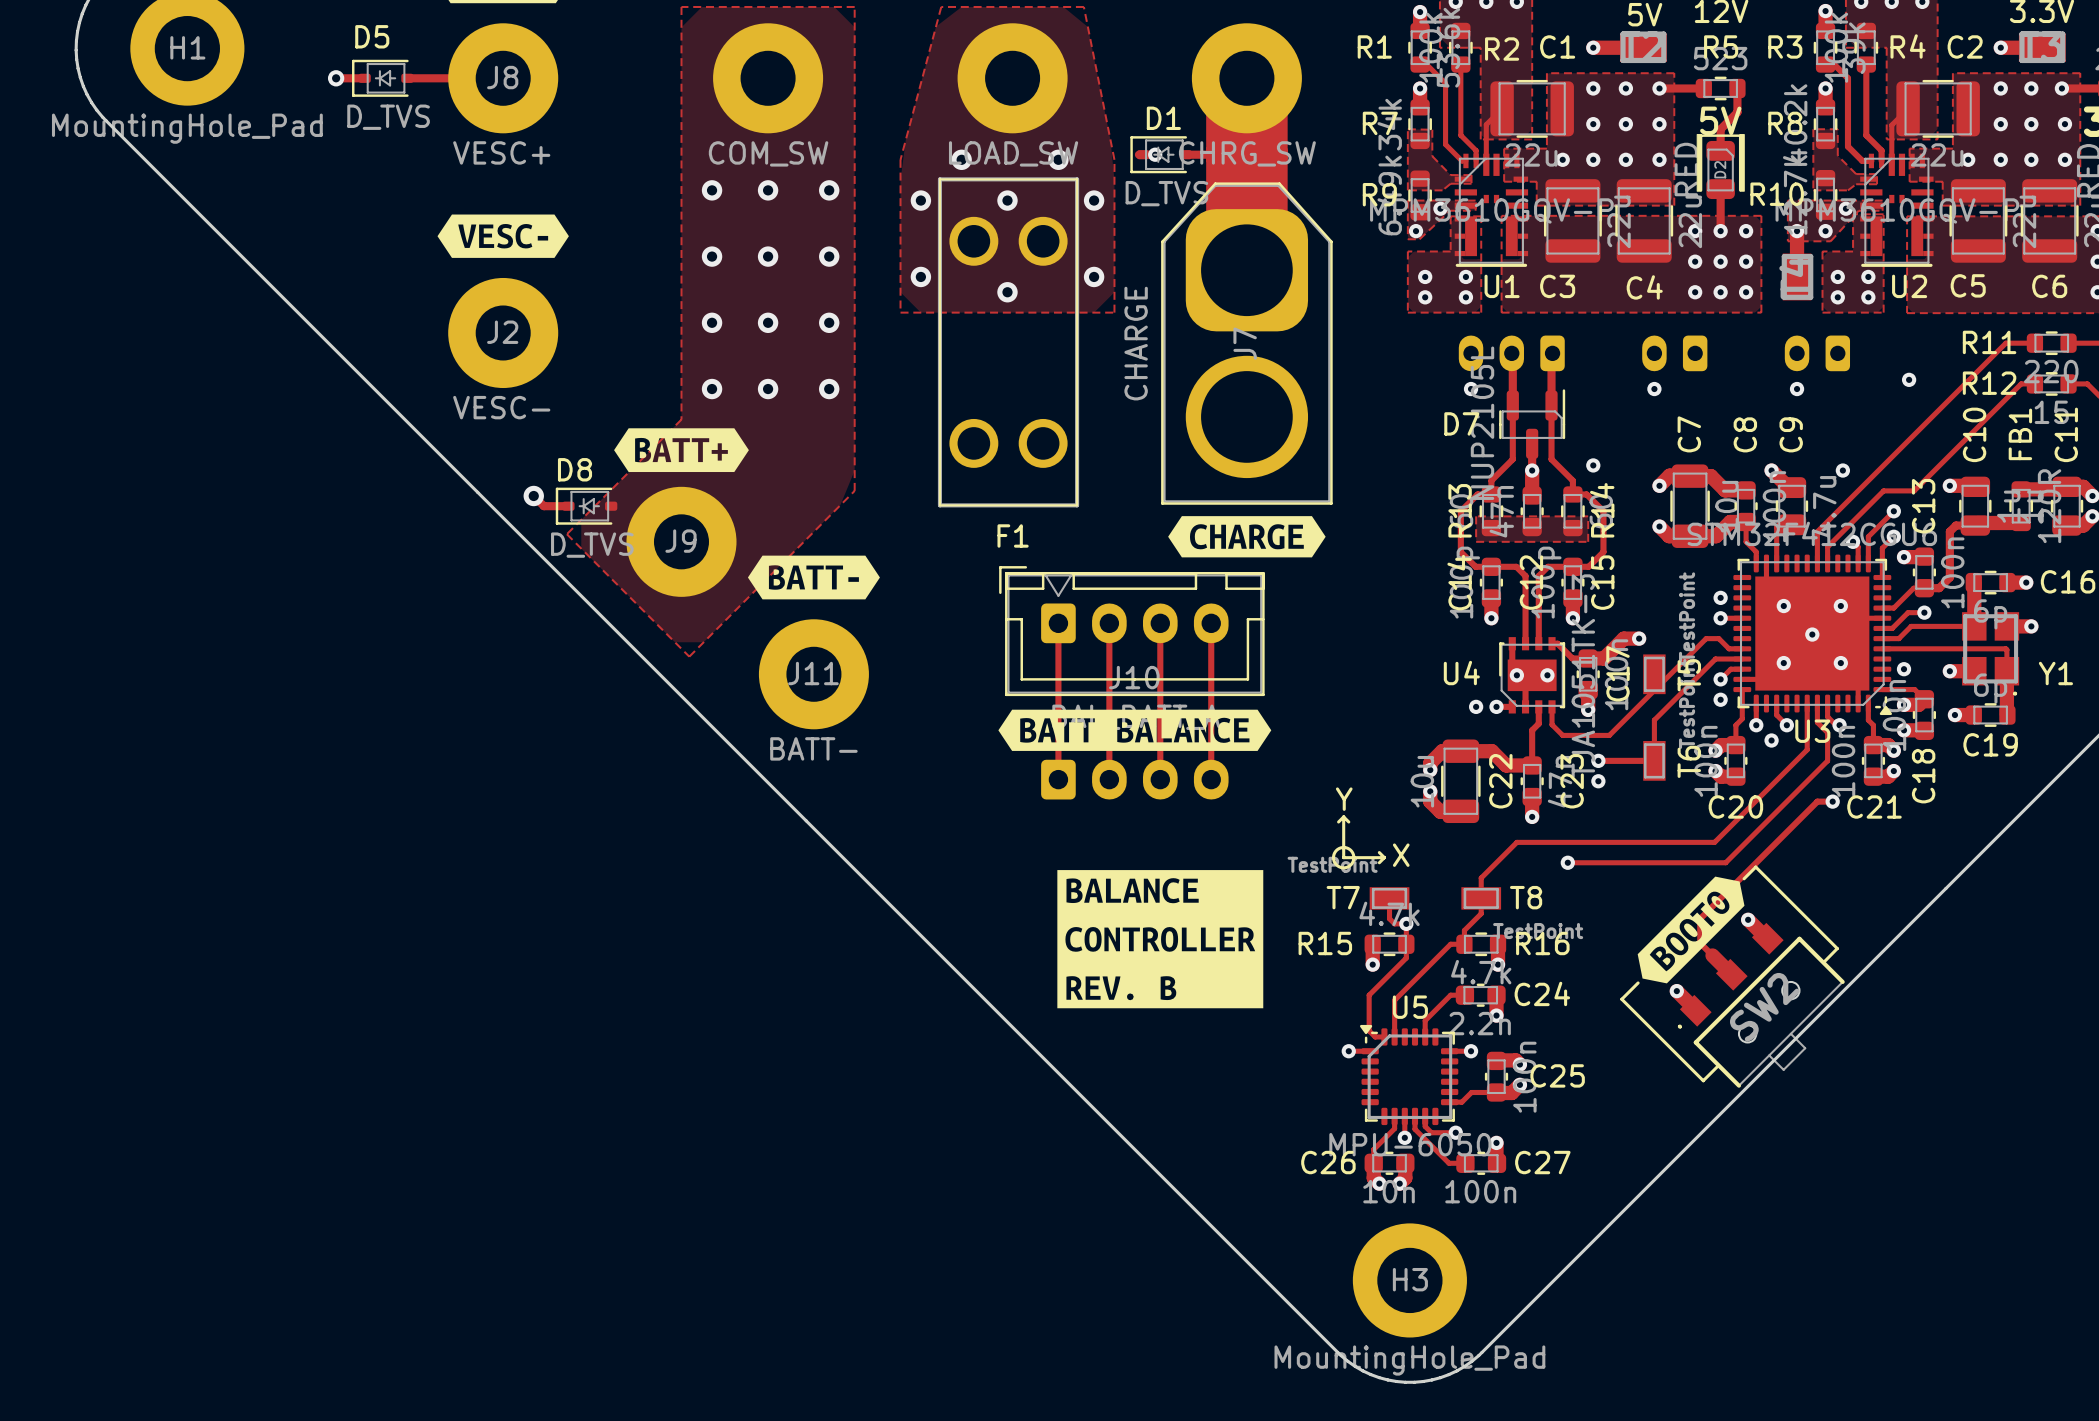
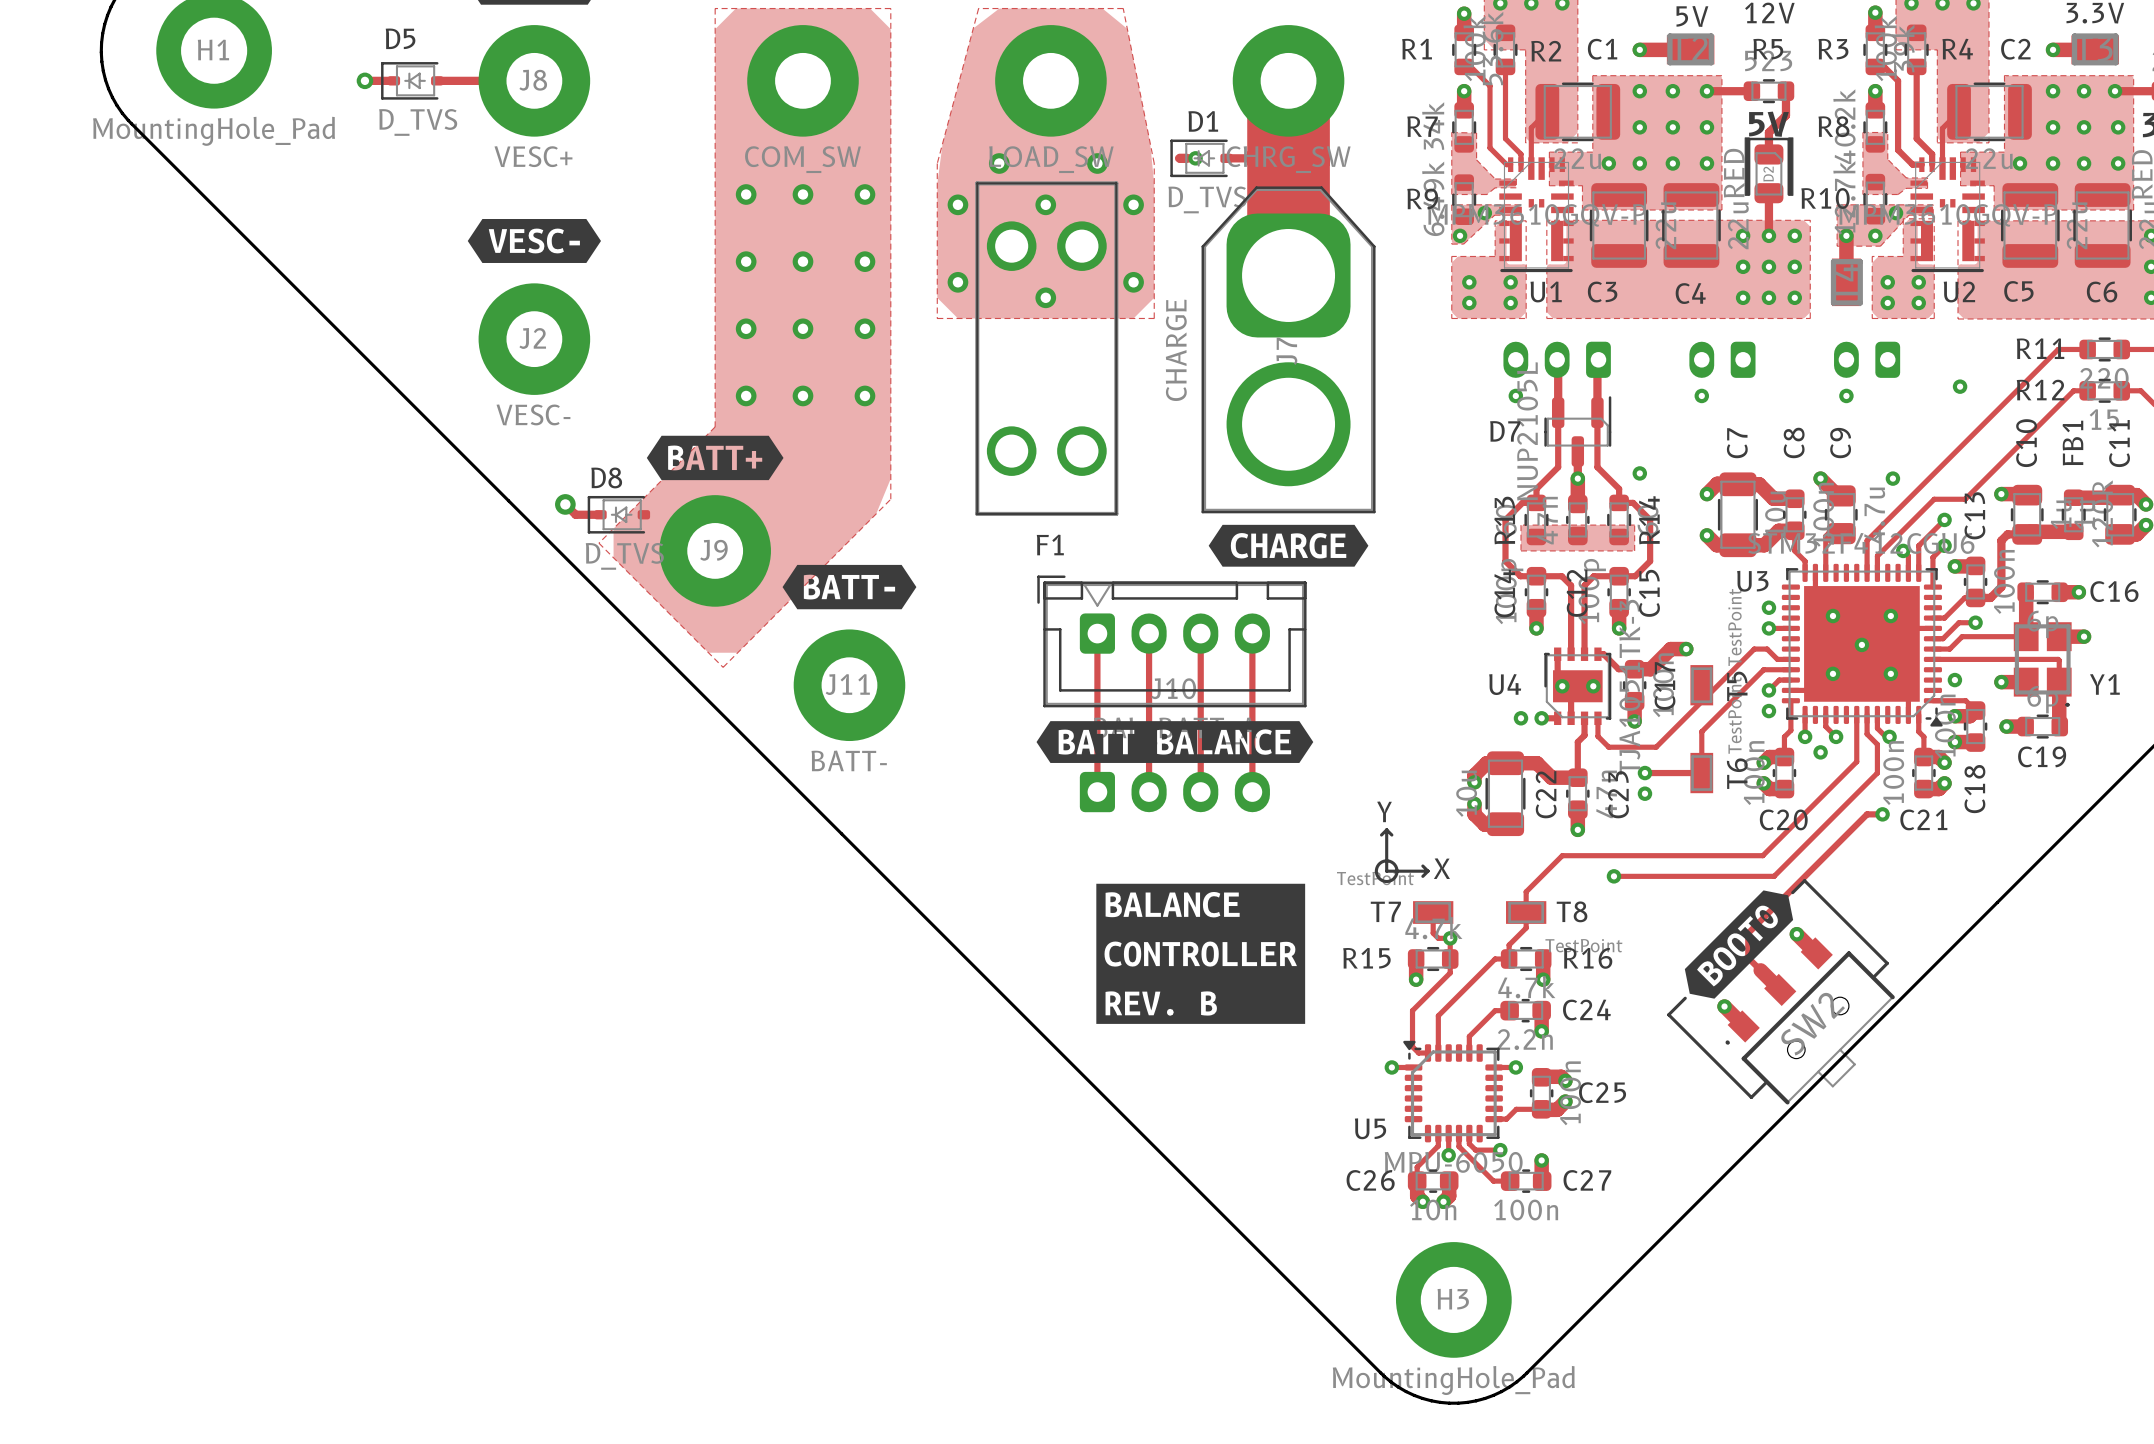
U3 name position: U3 (1812, 731) -> U3 (1752, 581)
U5 name position: U5 (1410, 1007) -> U5 (1370, 1128)

